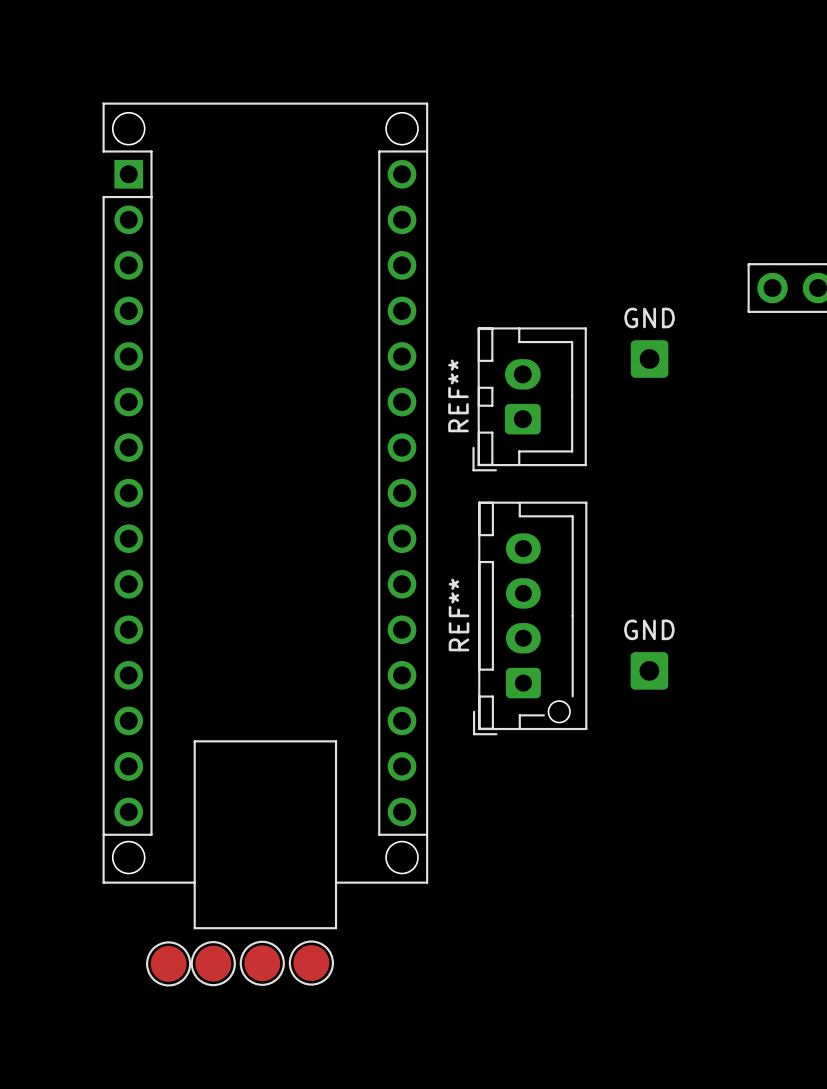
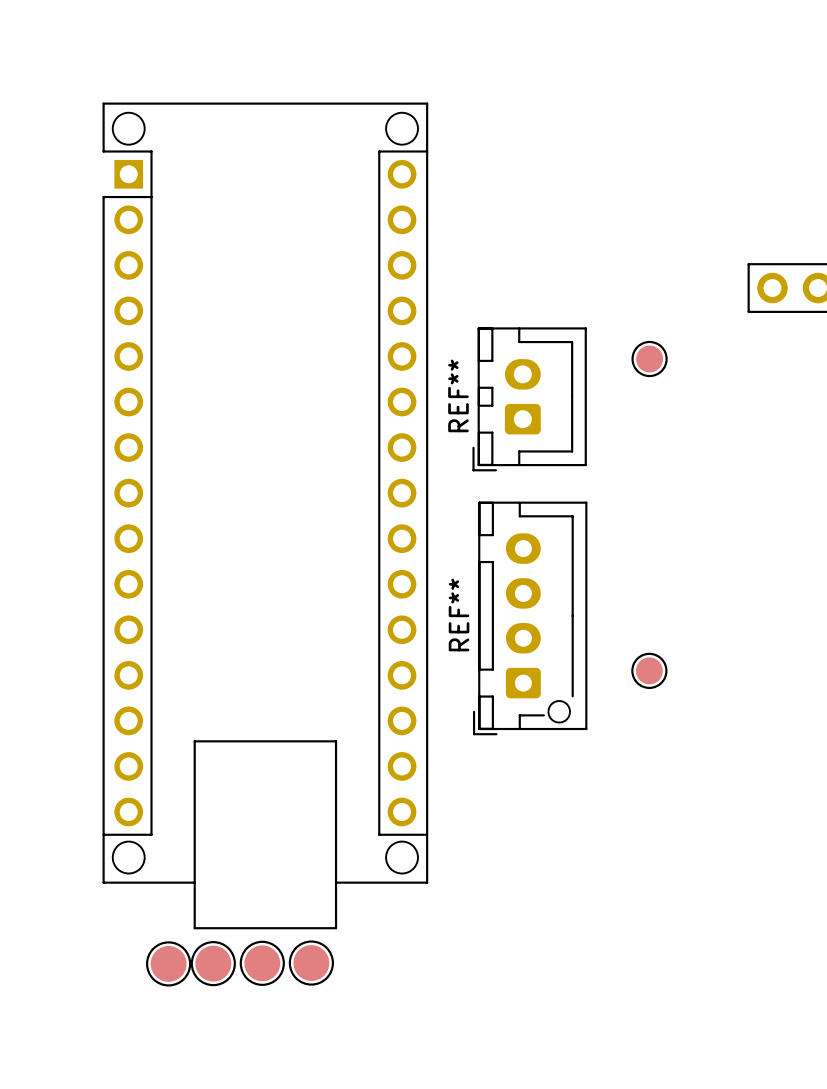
GND: (649, 359) -> none
part: none -> (649, 359)
GND: (649, 670) -> none
part: none -> (649, 670)

